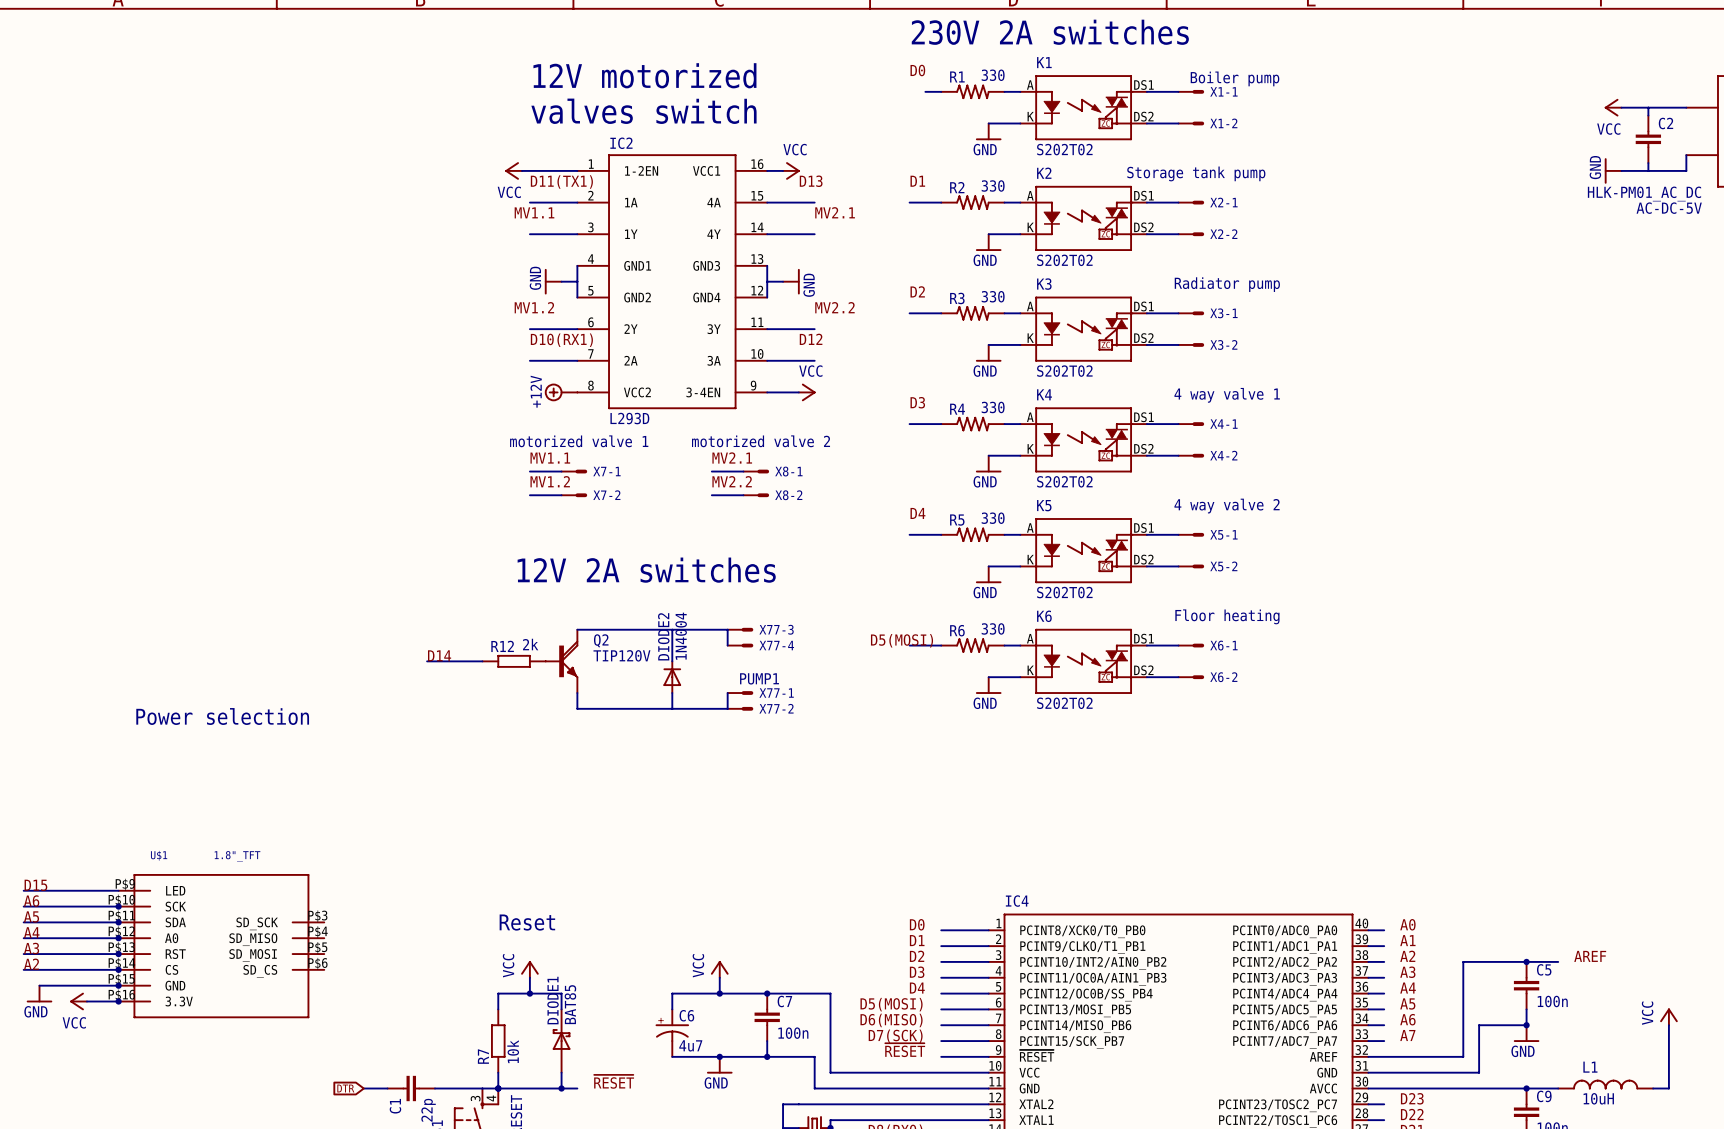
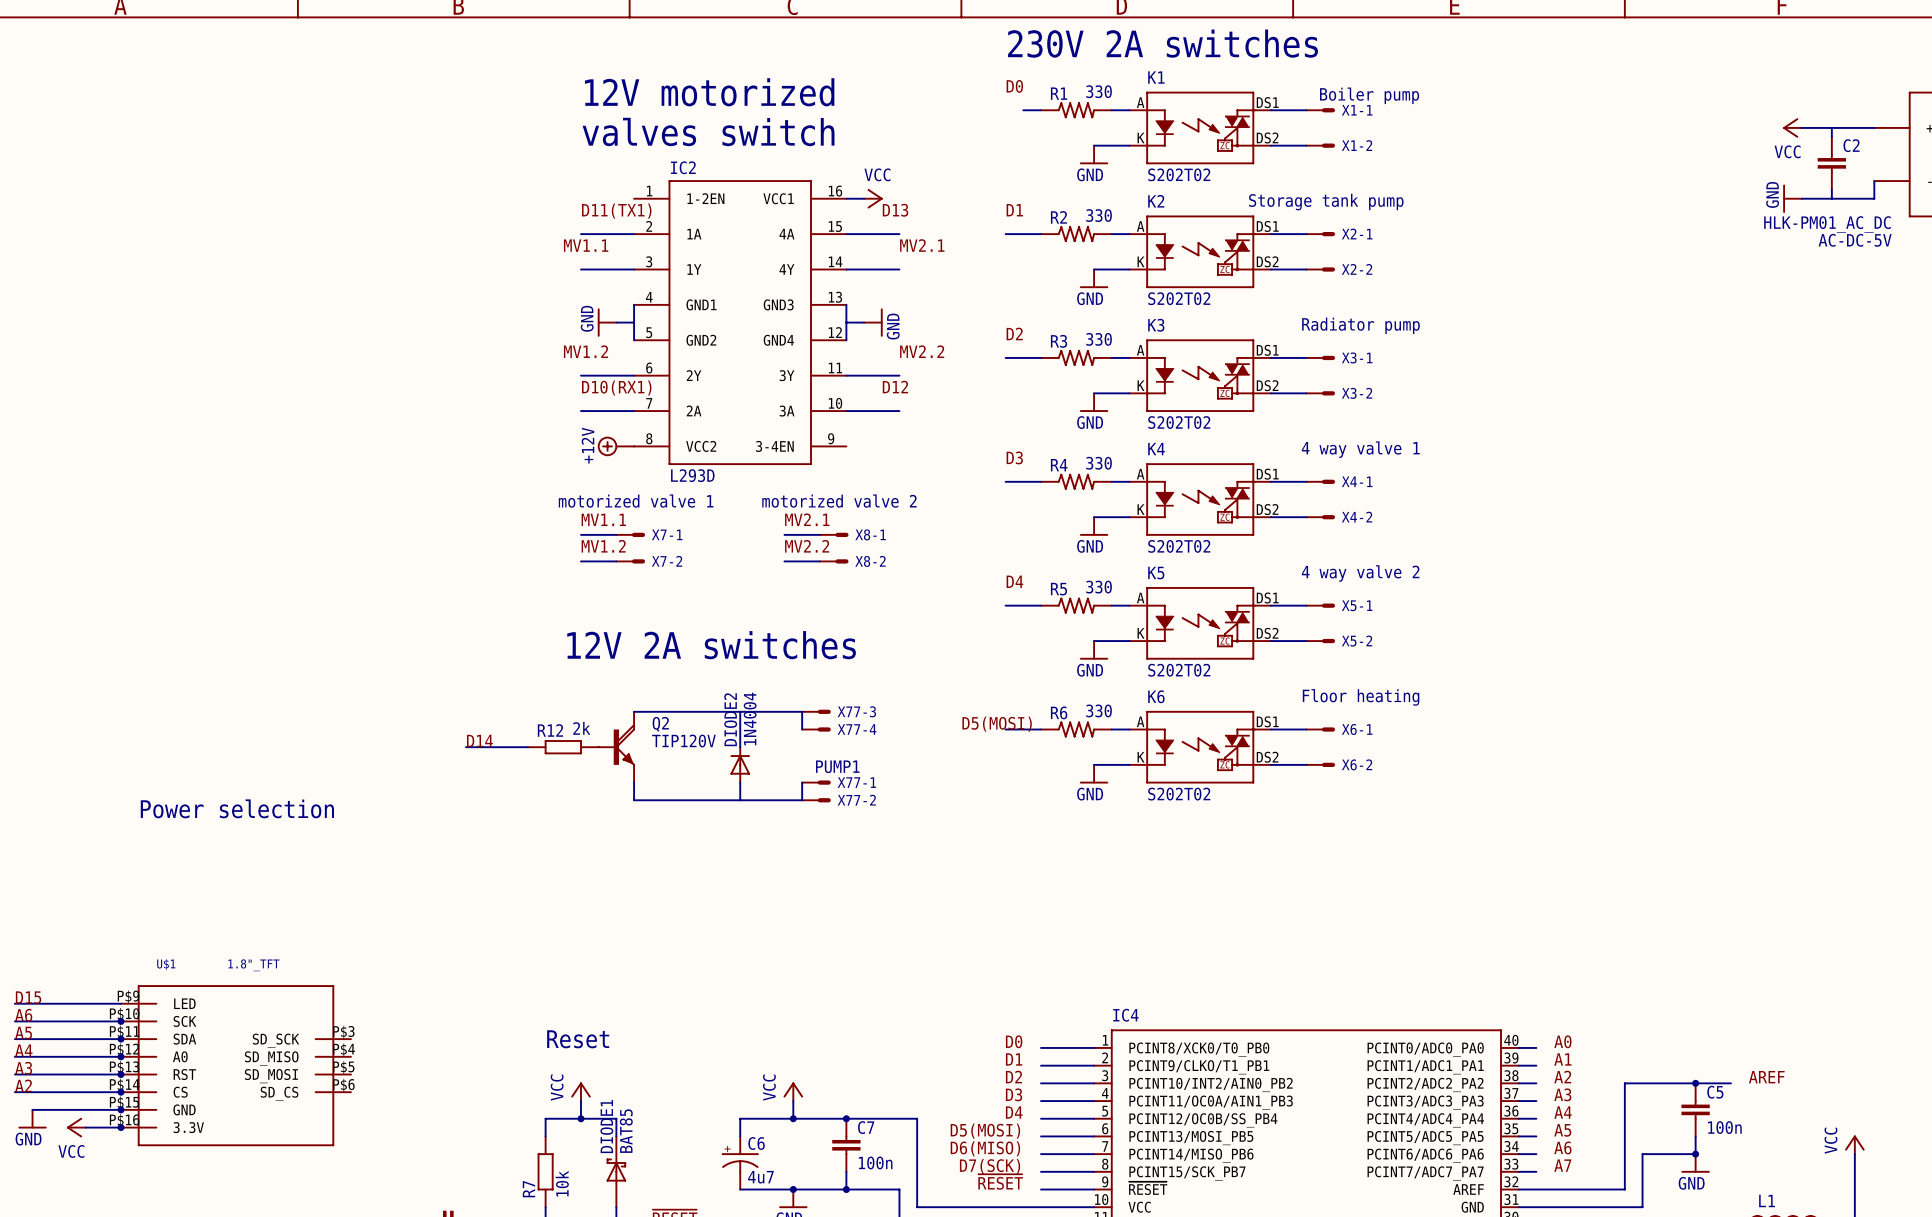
power symbol: VCC (513, 170) -> none
wire: (522, 170) (577, 170) -> none
wire: (767, 392) (798, 392) -> none
power symbol: VCC (807, 392) -> none

